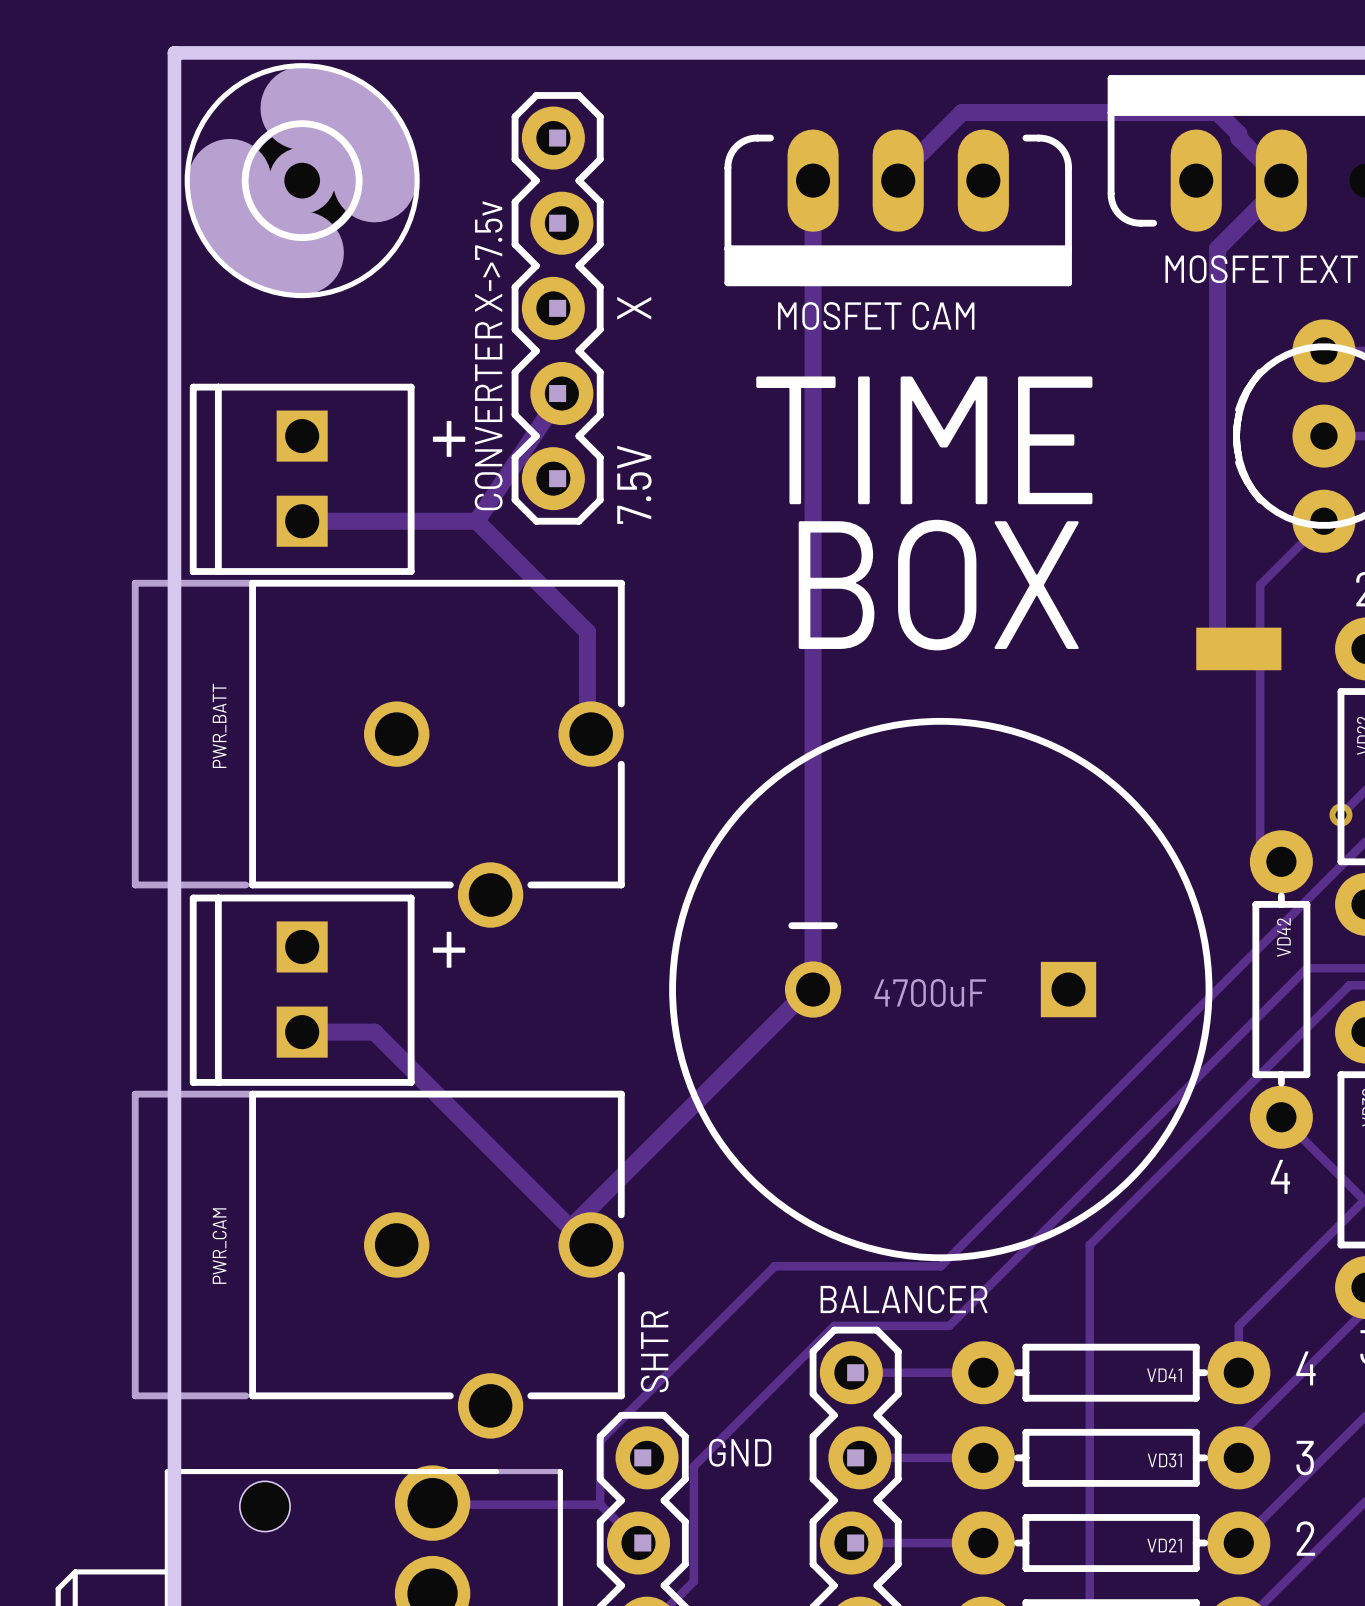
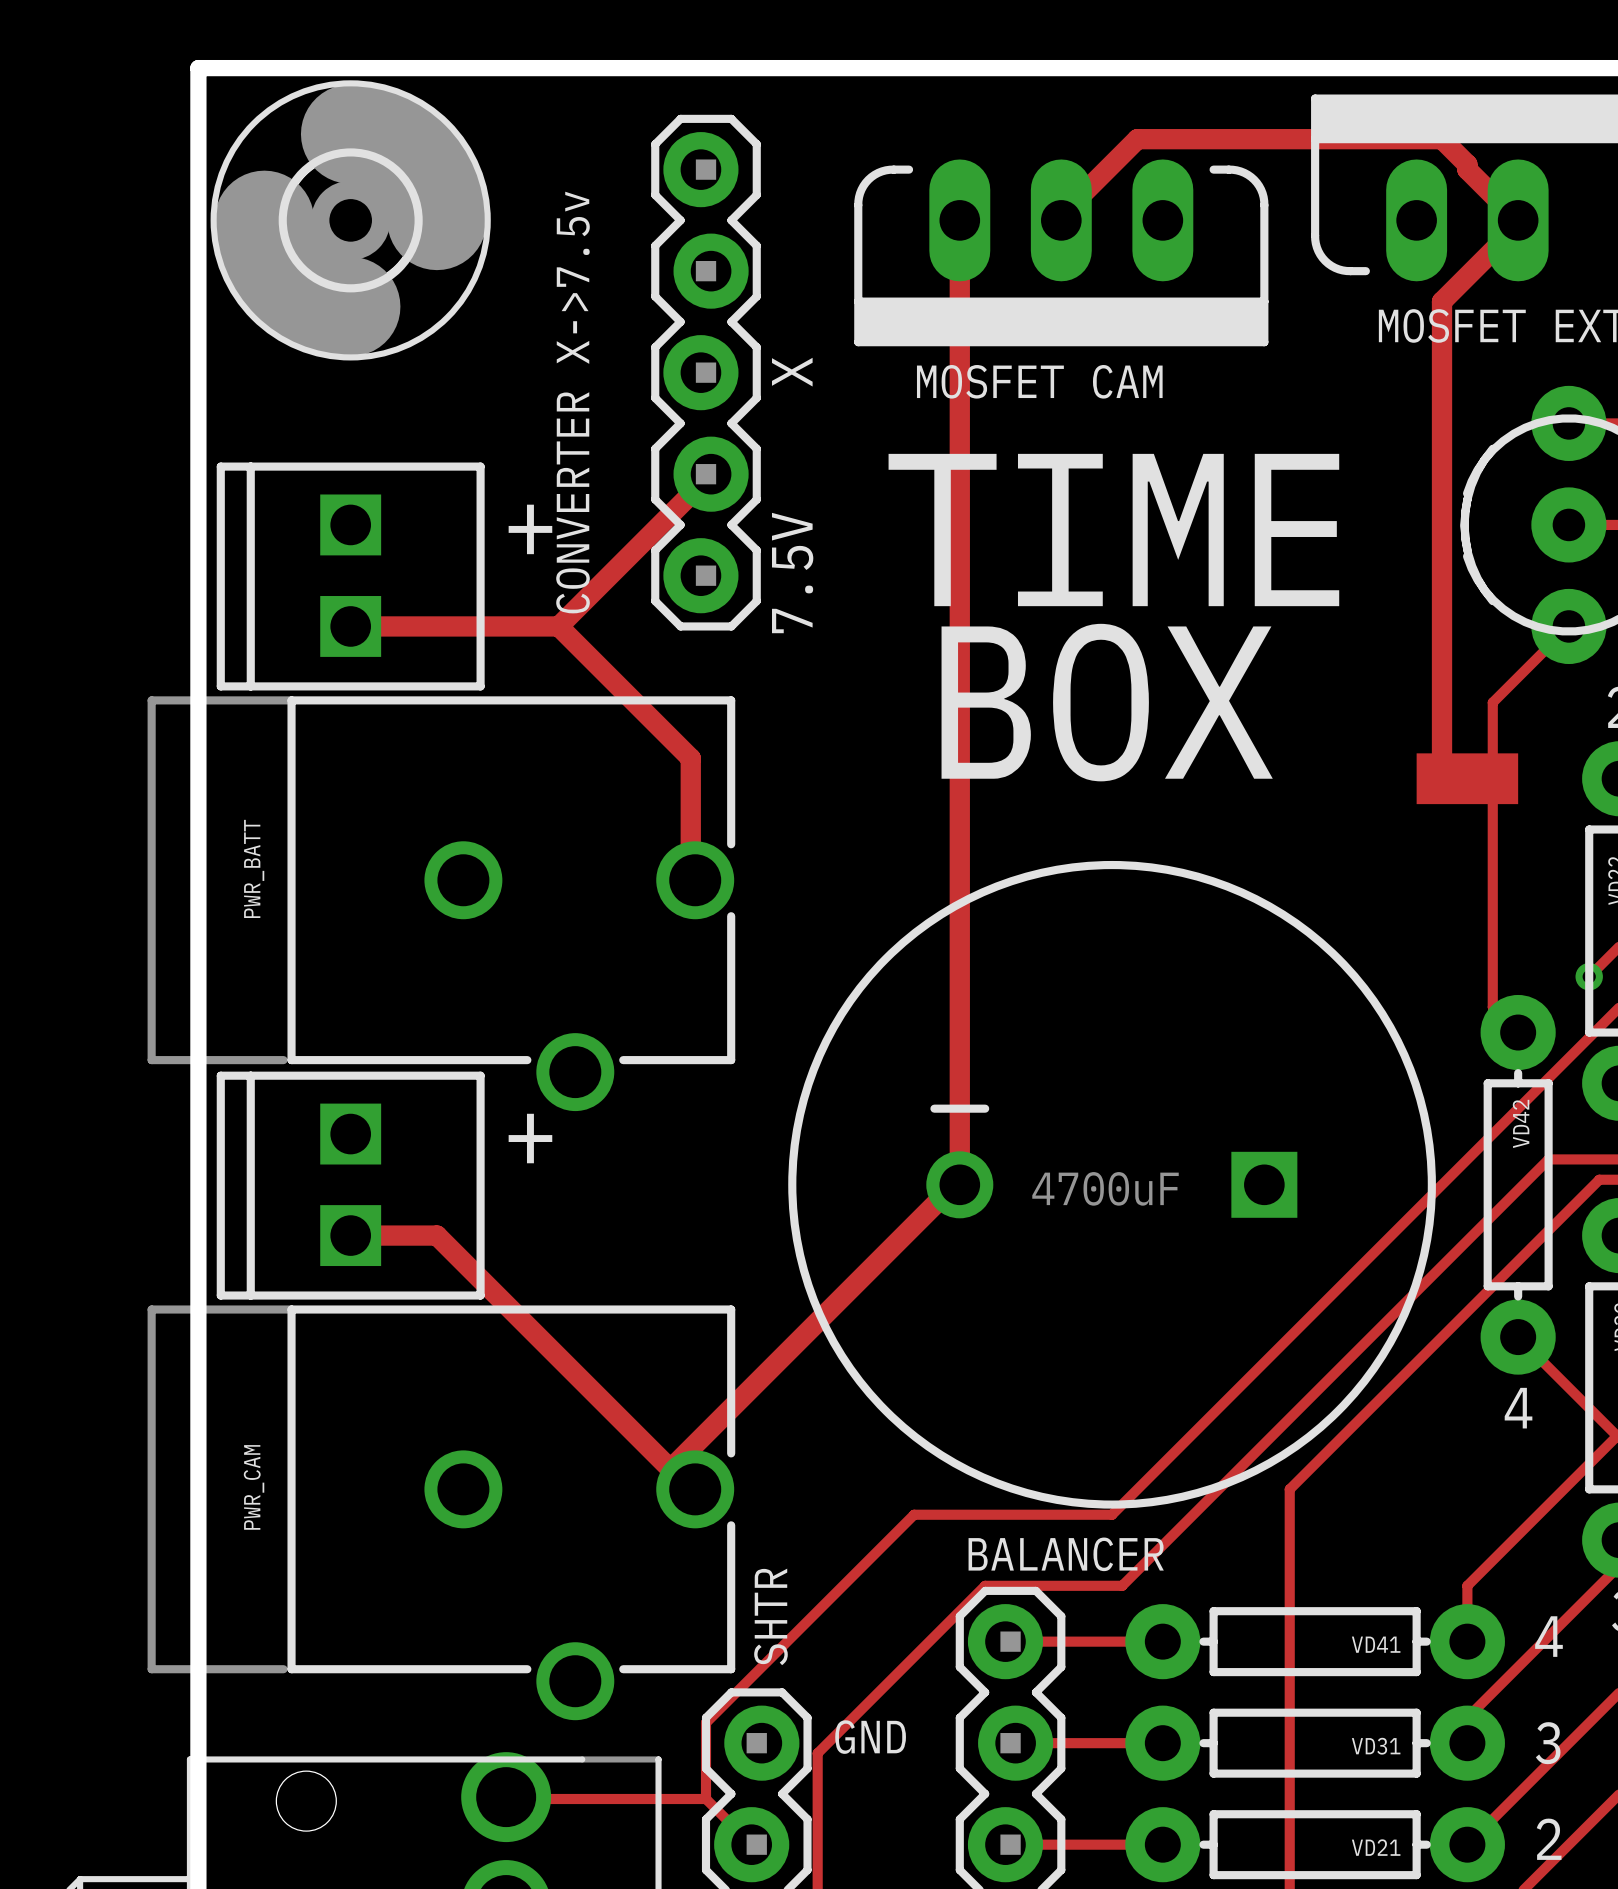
part position: (557, 308) -> (706, 372)
text position: X (634, 308) -> X (792, 372)
track: (561, 393) (476, 521) -> (711, 474) (558, 626)
text position: 7.5V (634, 484) -> 7.5V (792, 573)

